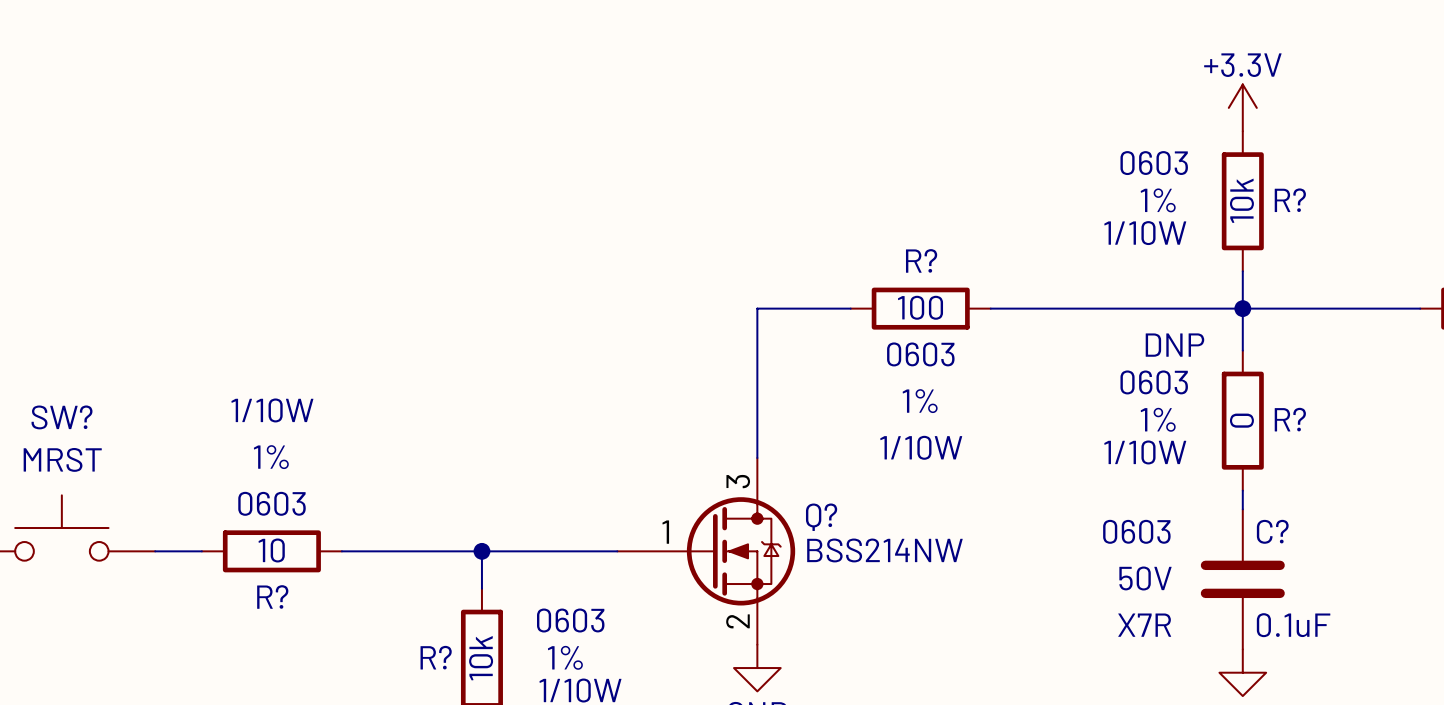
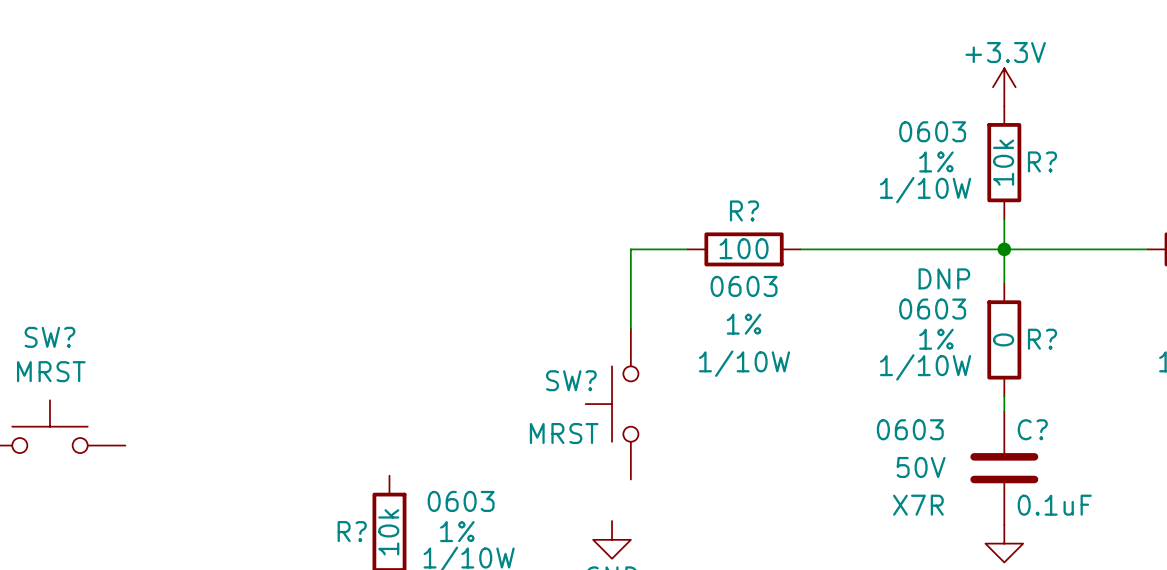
wire: (780, 308) (757, 308) (757, 457) -> (630, 249) (630, 328)
SW?: none -> MRST (612, 404)
wire: (155, 551) (201, 551) -> none
R?: 10 (271, 551) -> none
wire: (341, 551) (617, 551) -> none
wire: (481, 551) (481, 588) -> none
junction: (481, 551) -> none
Q?: BSS214NW (706, 551) -> none

